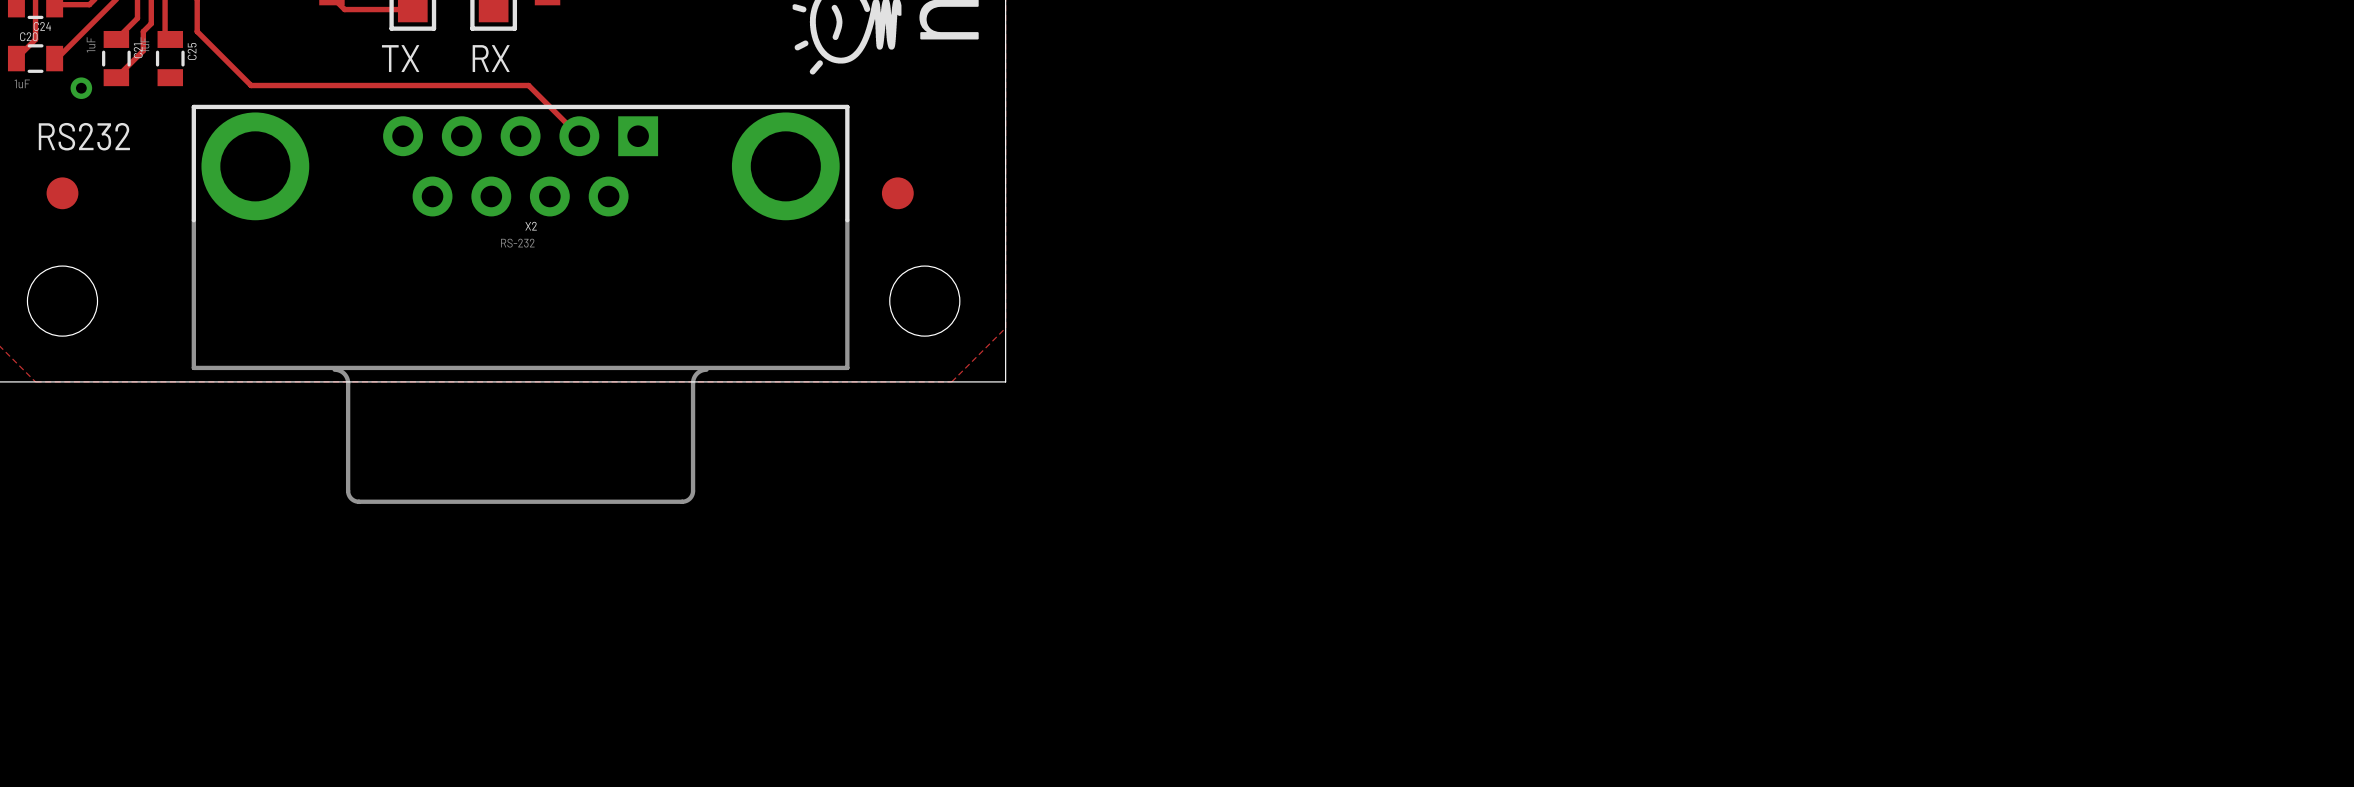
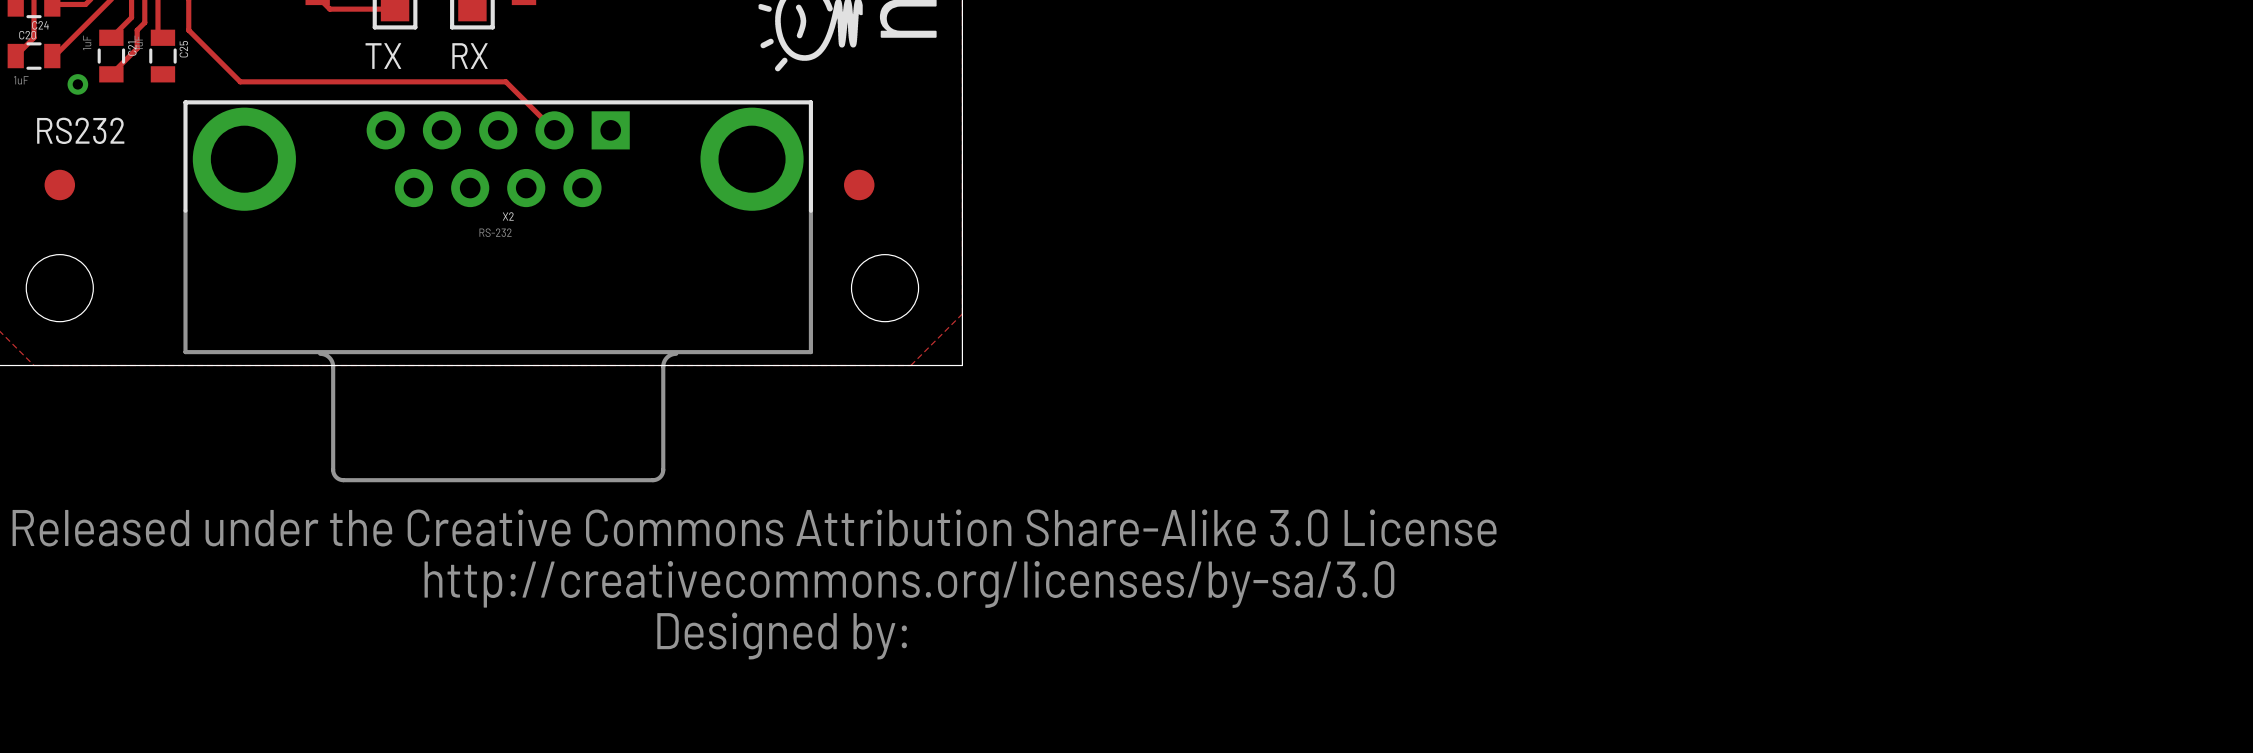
drawing: none -> [12, 509, 1497, 660]

